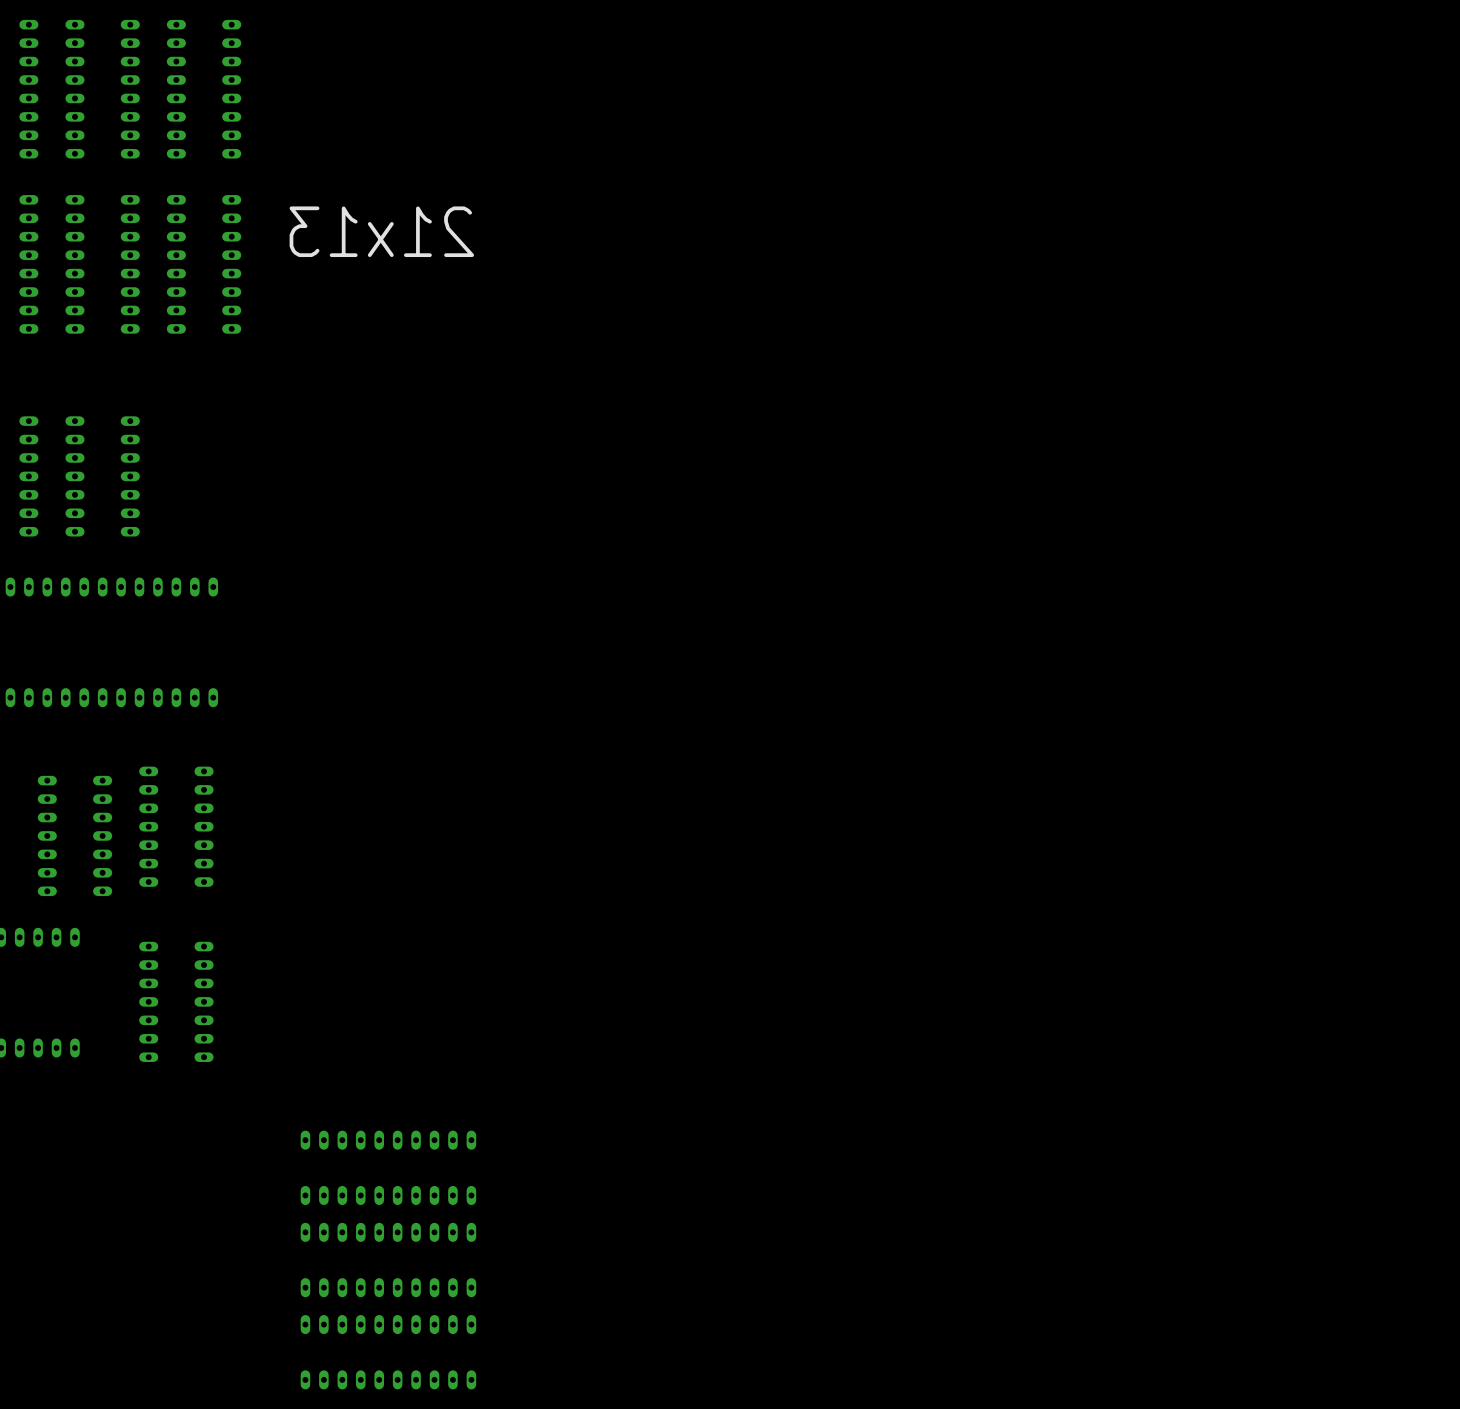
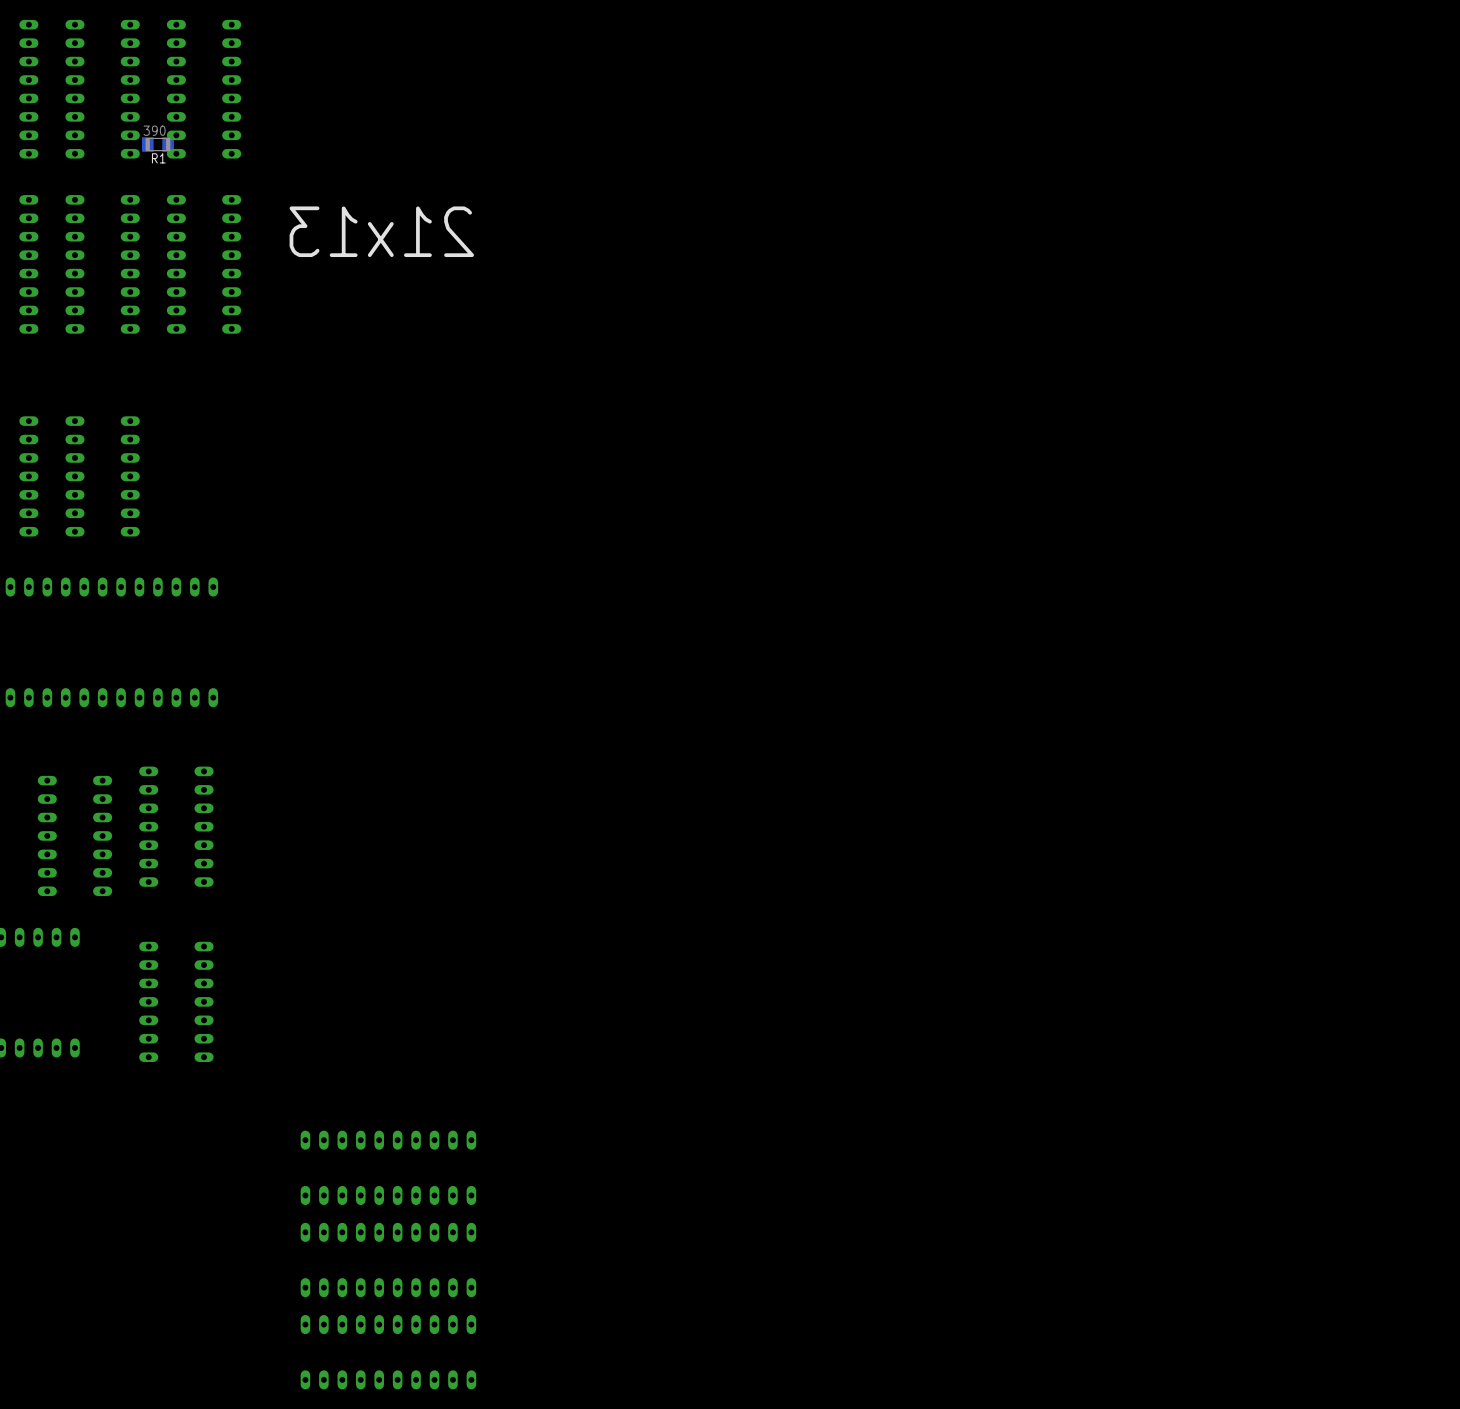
R1: none -> 390 (157, 144)

